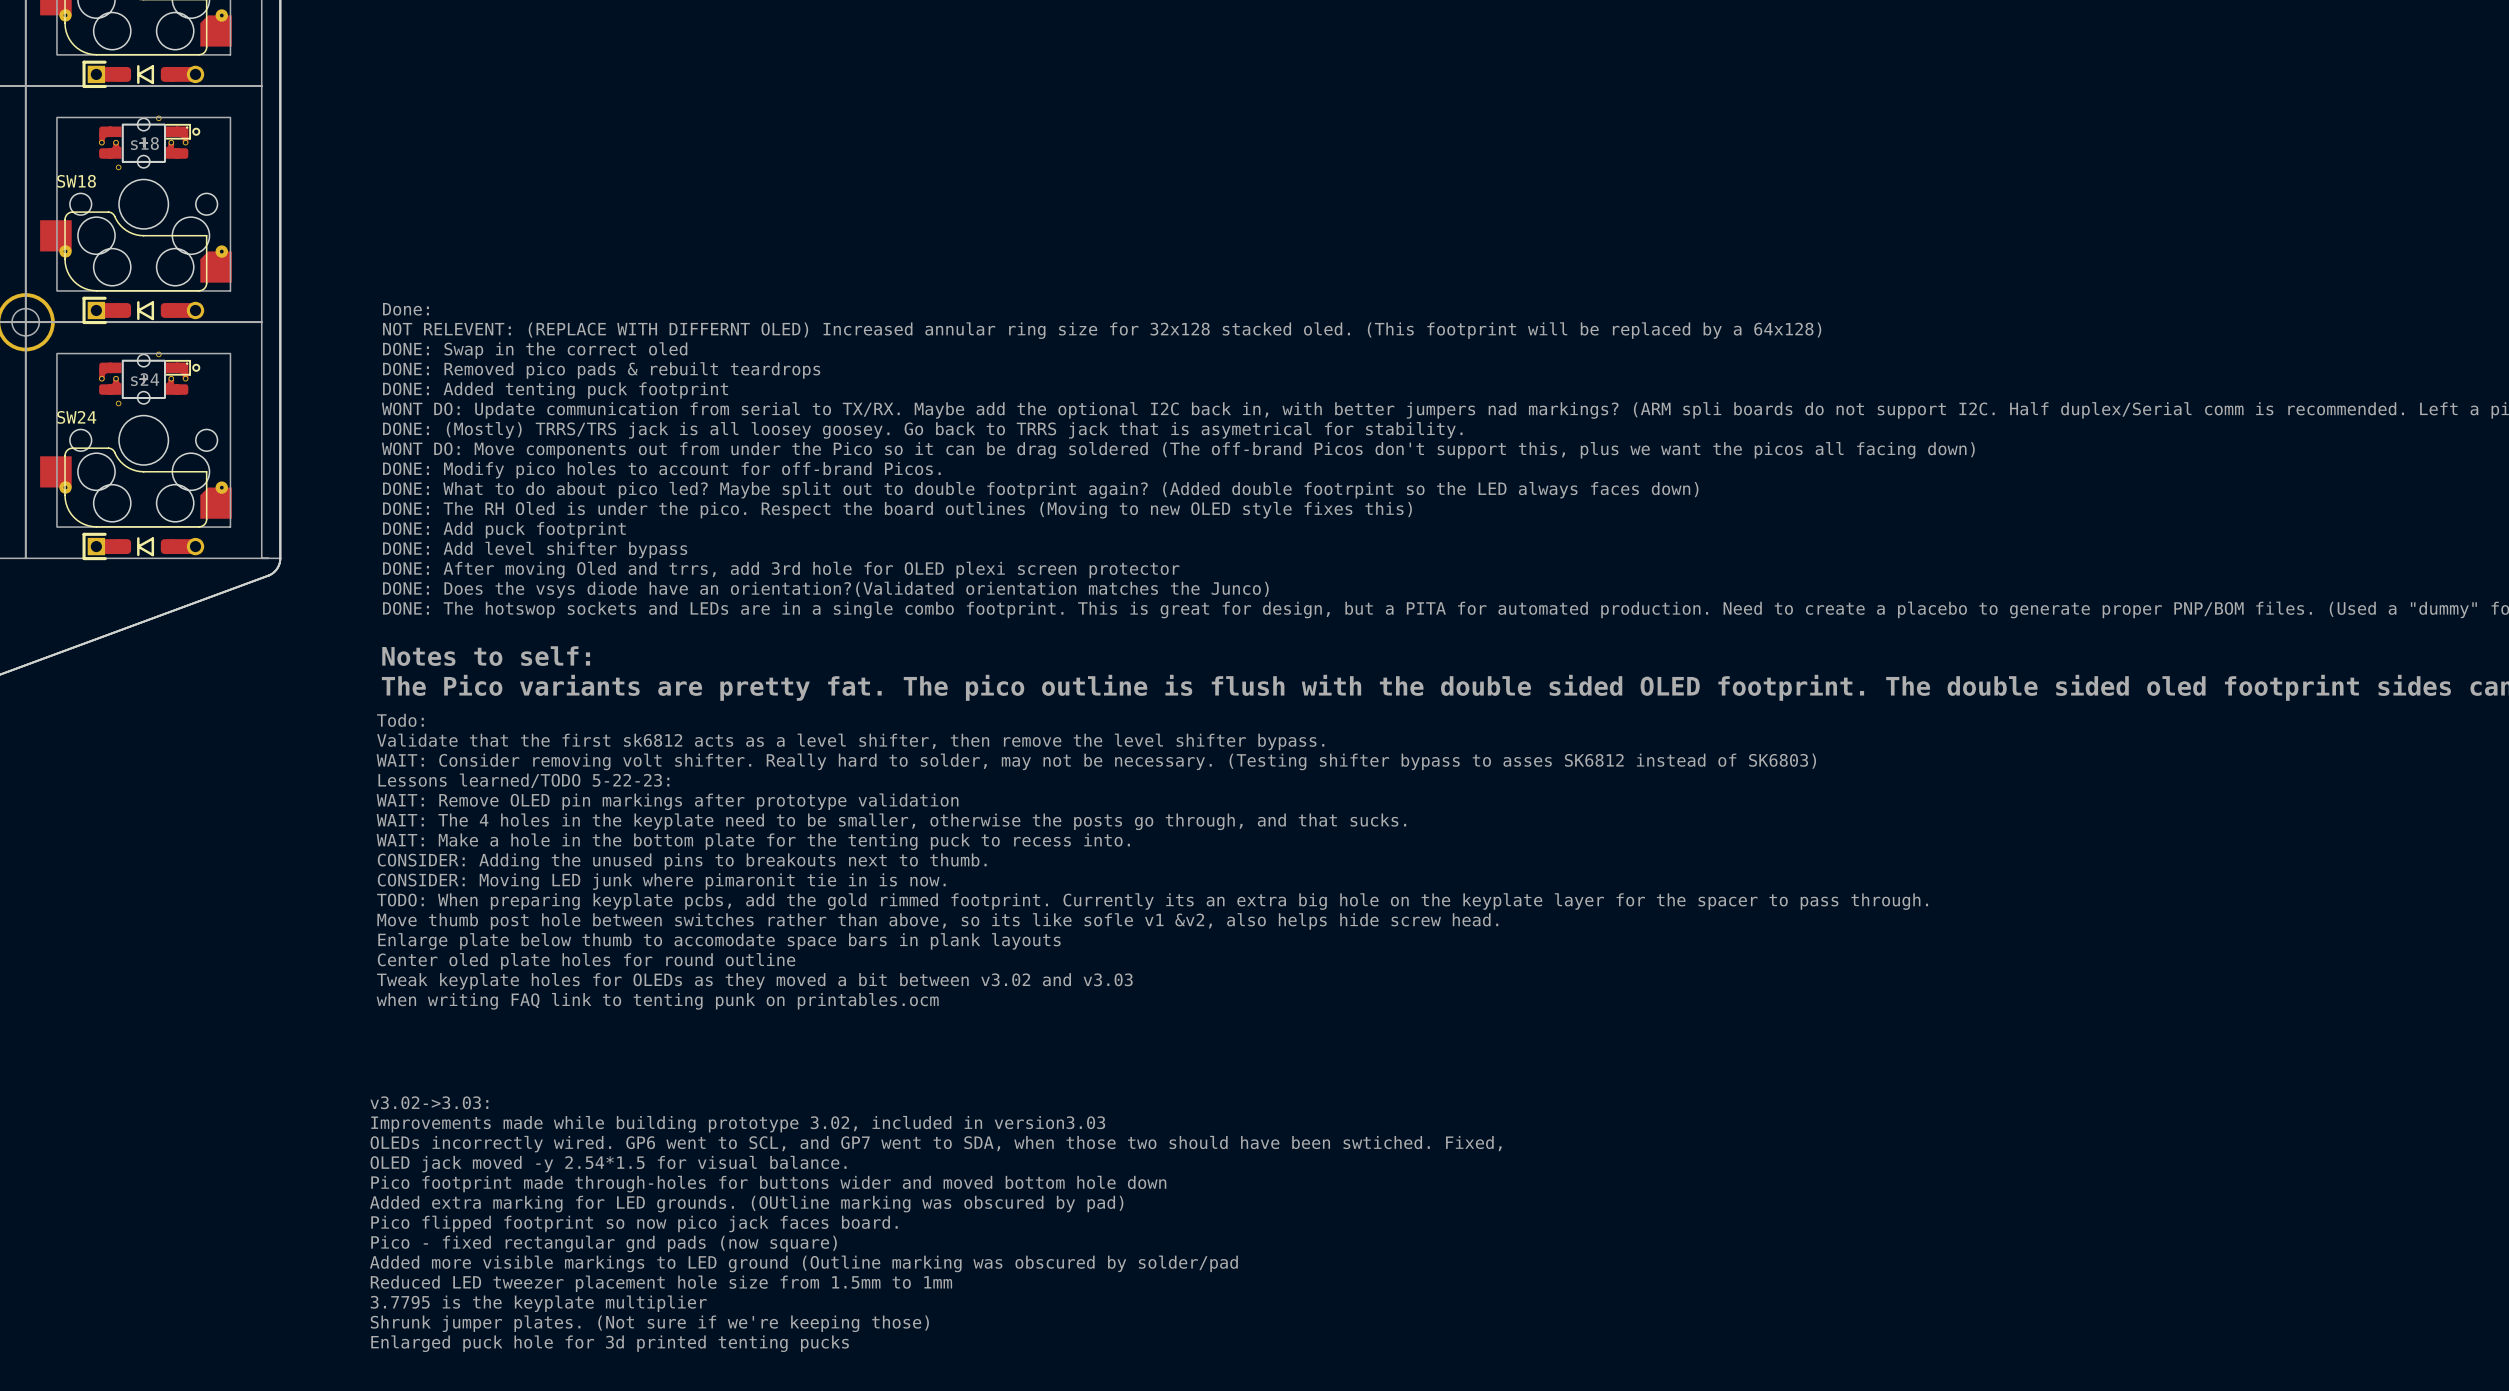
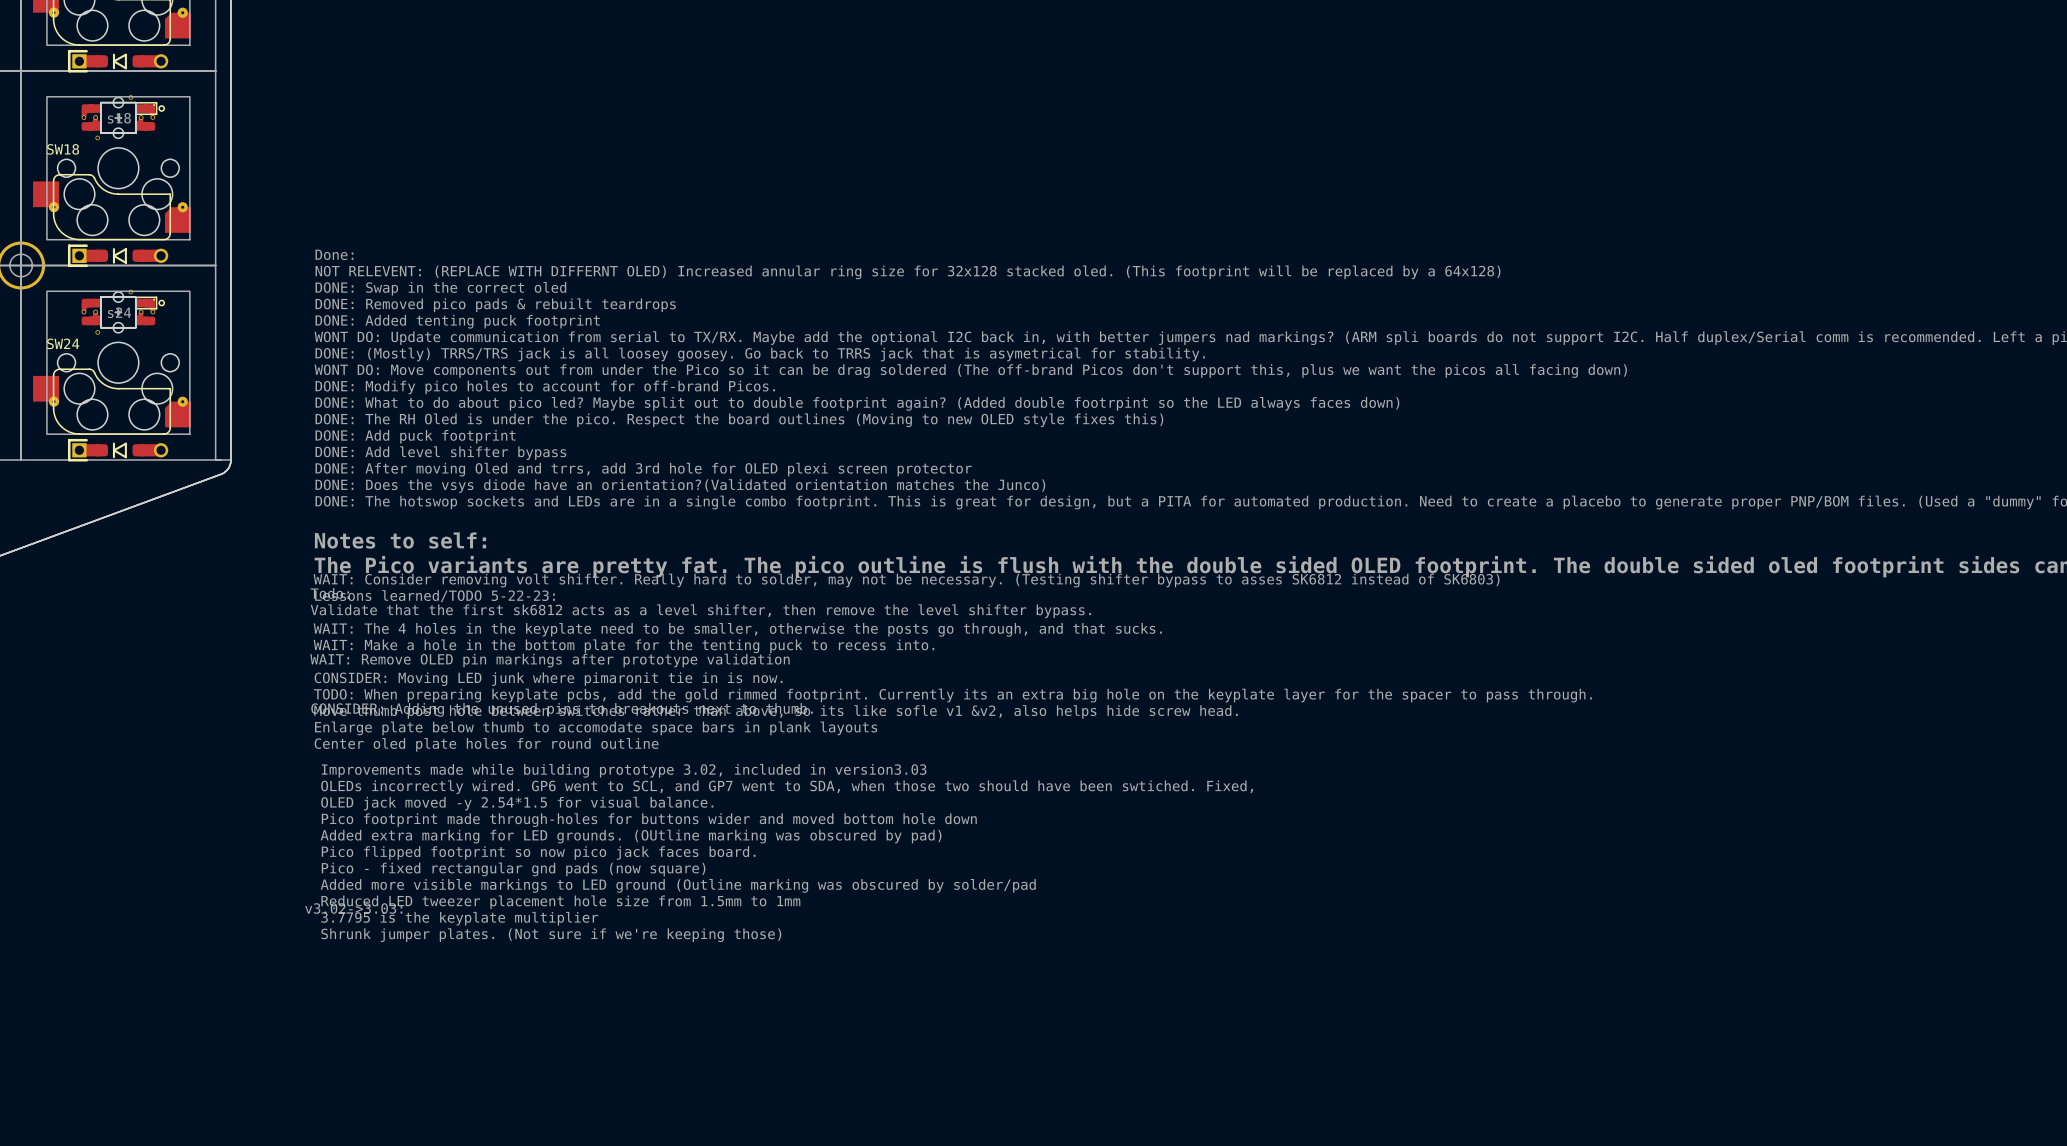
text position: WAIT: Consider removing volt shifter. Really hard to solder, may not be necessary. (Testing shifter bypass to asses SK6812 instead of SK6803) (1096, 761) -> WAIT: Consider removing volt shifter. Really hard to solder, may not be necessary. (Testing shifter bypass to asses SK6812 instead of SK6803) (906, 580)
text position: Lessons learned/TODO 5-22-23: (523, 780) -> Lessons learned/TODO 5-22-23: (435, 596)
text position: WAIT: The 4 holes in the keyplate need to be smaller, otherwise the posts go through, and that sucks. (891, 821) -> WAIT: The 4 holes in the keyplate need to be smaller, otherwise the posts go through, and that sucks. (737, 629)
text position: WAIT: Make a hole in the bottom plate for the tenting puck to recess into. (753, 841) -> WAIT: Make a hole in the bottom plate for the tenting puck to recess into. (623, 646)
text position: CONSIDER: Moving LED junk where pimaronit tie in is now. (661, 881) -> CONSIDER: Moving LED junk where pimaronit tie in is now. (548, 679)
text position: TODO: When preparing keyplate pcbs, add the gold rimmed footprint. Currently its an extra big hole on the keyplate layer for the spacer to pass through. (1152, 901) -> TODO: When preparing keyplate pcbs, add the gold rimmed footprint. Currently its an extra big hole on the keyplate layer for the spacer to pass through. (952, 695)
text position: Move thumb post hole between switches rather than above, so its like sofle v1 &v2, also helps hide screw head. (937, 921) -> Move thumb post hole between switches rather than above, so its like sofle v1 &v2, also helps hide screw head. (776, 711)
text position: Enlarge plate below thumb to accomodate space bars in plank layouts (719, 941) -> Enlarge plate below thumb to accomodate space bars in plank layouts (596, 728)
text position: Center oled plate holes for round outline (586, 961) -> Center oled plate holes for round outline (486, 744)
text: Tweak keyplate holes for OLEDs as they moved a bit between v3.02 and v3.03 (754, 981) -> none
text: when writing FAQ link to tenting punk on printables.ocm (657, 1001) -> none
text position: Improvements made while building prototype 3.02, included in version3.03 (738, 1124) -> Improvements made while building prototype 3.02, included in version3.03 (624, 770)
text position: OLEDs incorrectly wired. GP6 went to SCL, and GP7 went to SDA, when those two should have been swtiched. Fixed, (936, 1144) -> OLEDs incorrectly wired. GP6 went to SCL, and GP7 went to SDA, when those two should have been swtiched. Fixed, (787, 787)
text position: OLED jack moved -y 2.54*1.5 for visual balance. (608, 1164) -> OLED jack moved -y 2.54*1.5 for visual balance. (517, 803)
text position: Pico footprint made through-holes for buttons wider and moved bottom hole down (768, 1184) -> Pico footprint made through-holes for buttons wider and moved bottom hole down (649, 820)
text position: Added extra marking for LED grounds. (OUtline marking was obscured by pad) (746, 1204) -> Added extra marking for LED grounds. (OUtline marking was obscured by pad) (631, 836)
text position: Pico flipped footprint so now pico jack faces board. (634, 1223) -> Pico flipped footprint so now pico jack faces board. (538, 852)
text position: Pico - fixed rectangular gnd pads (now square) (604, 1243) -> Pico - fixed rectangular gnd pads (now square) (513, 869)
text position: Added more visible markings to LED ground (Outline marking was obscured by solder/pad (803, 1263) -> Added more visible markings to LED ground (Outline marking was obscured by solder/pad (678, 885)
text position: Reduced LED tweezer placement hole size from 1.5mm to 1mm (661, 1283) -> Reduced LED tweezer placement hole size from 1.5mm to 1mm (560, 902)
text position: 3.7795 is the keyplate multiplier (538, 1303) -> 3.7795 is the keyplate multiplier (459, 918)
text position: Shrunk jumper plates. (Not sure if we're keeping those) (649, 1323) -> Shrunk jumper plates. (Not sure if we're keeping those) (551, 935)
text: Enlarged puck hole for 3d printed tenting pucks (610, 1343) -> none

